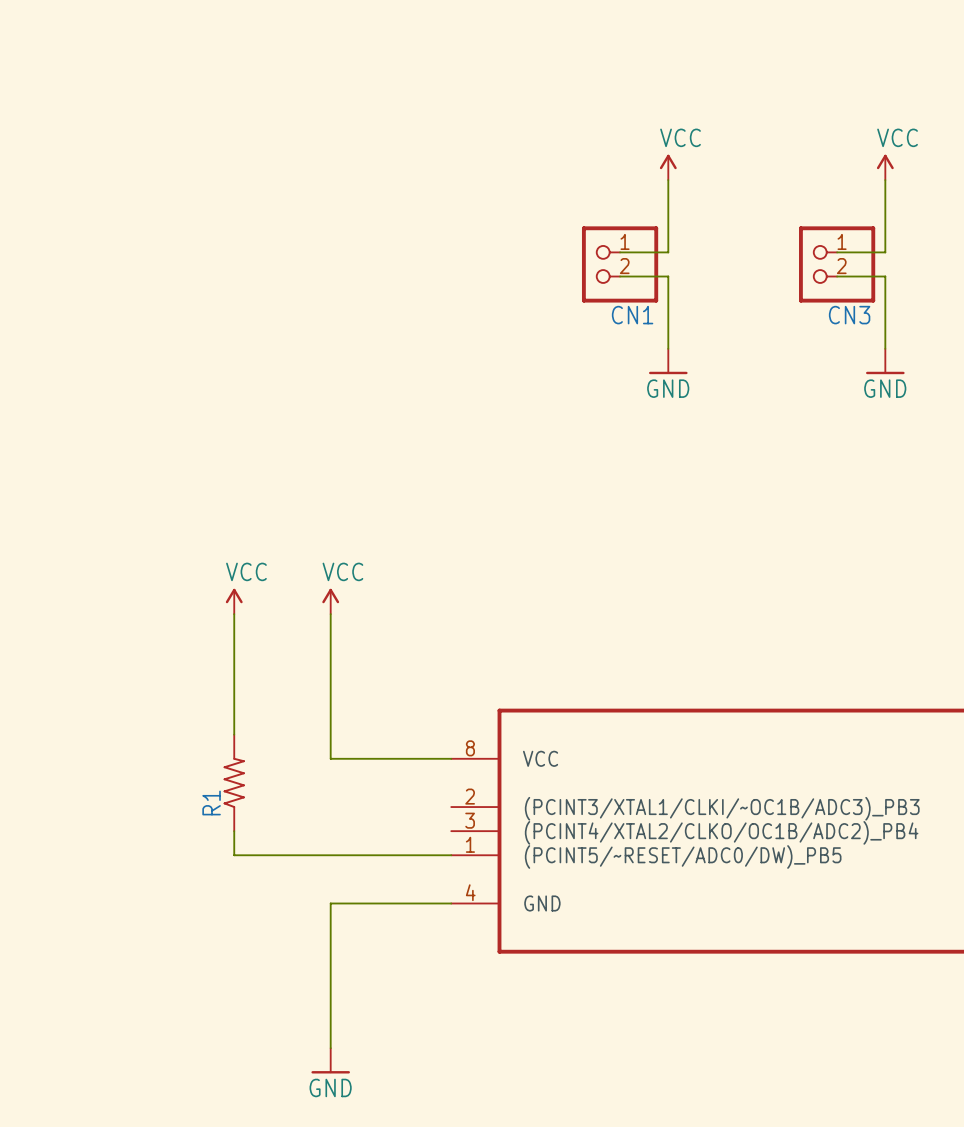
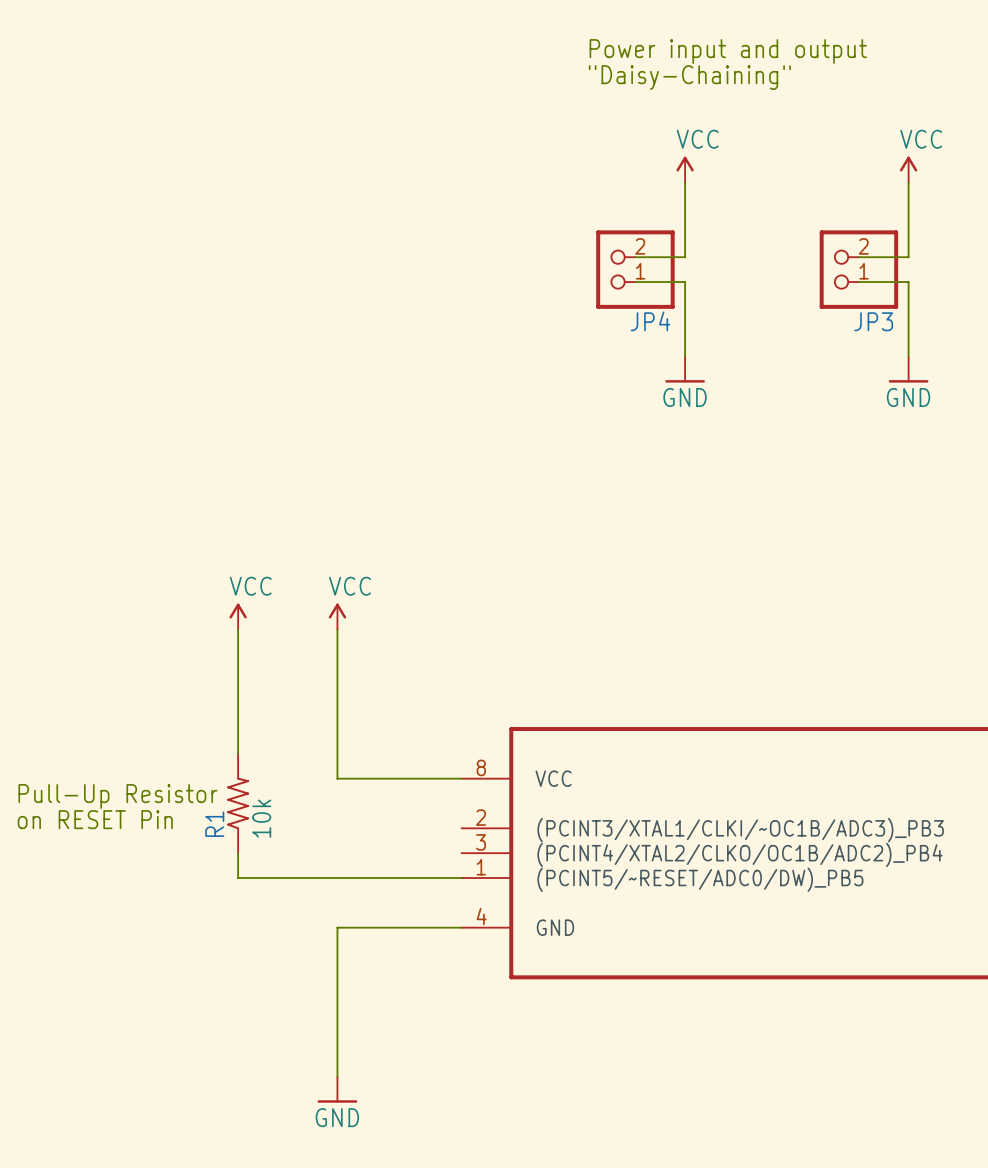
text: none -> Power input and output (728, 51)
text: none -> "Daisy-Chaining" (689, 77)
CN1 flip: as is (620, 264) -> up-down (635, 269)
CN3 flip: as is (837, 264) -> up-down (858, 269)
CN1 name: CN1 (632, 315) -> JP4 (650, 321)
CN3 name: CN3 (849, 315) -> JP3 (873, 321)
text: none -> Pull-Up Resistor (117, 796)
R1 value: none -> 10k (261, 818)
text: none -> on RESET Pin (95, 819)

